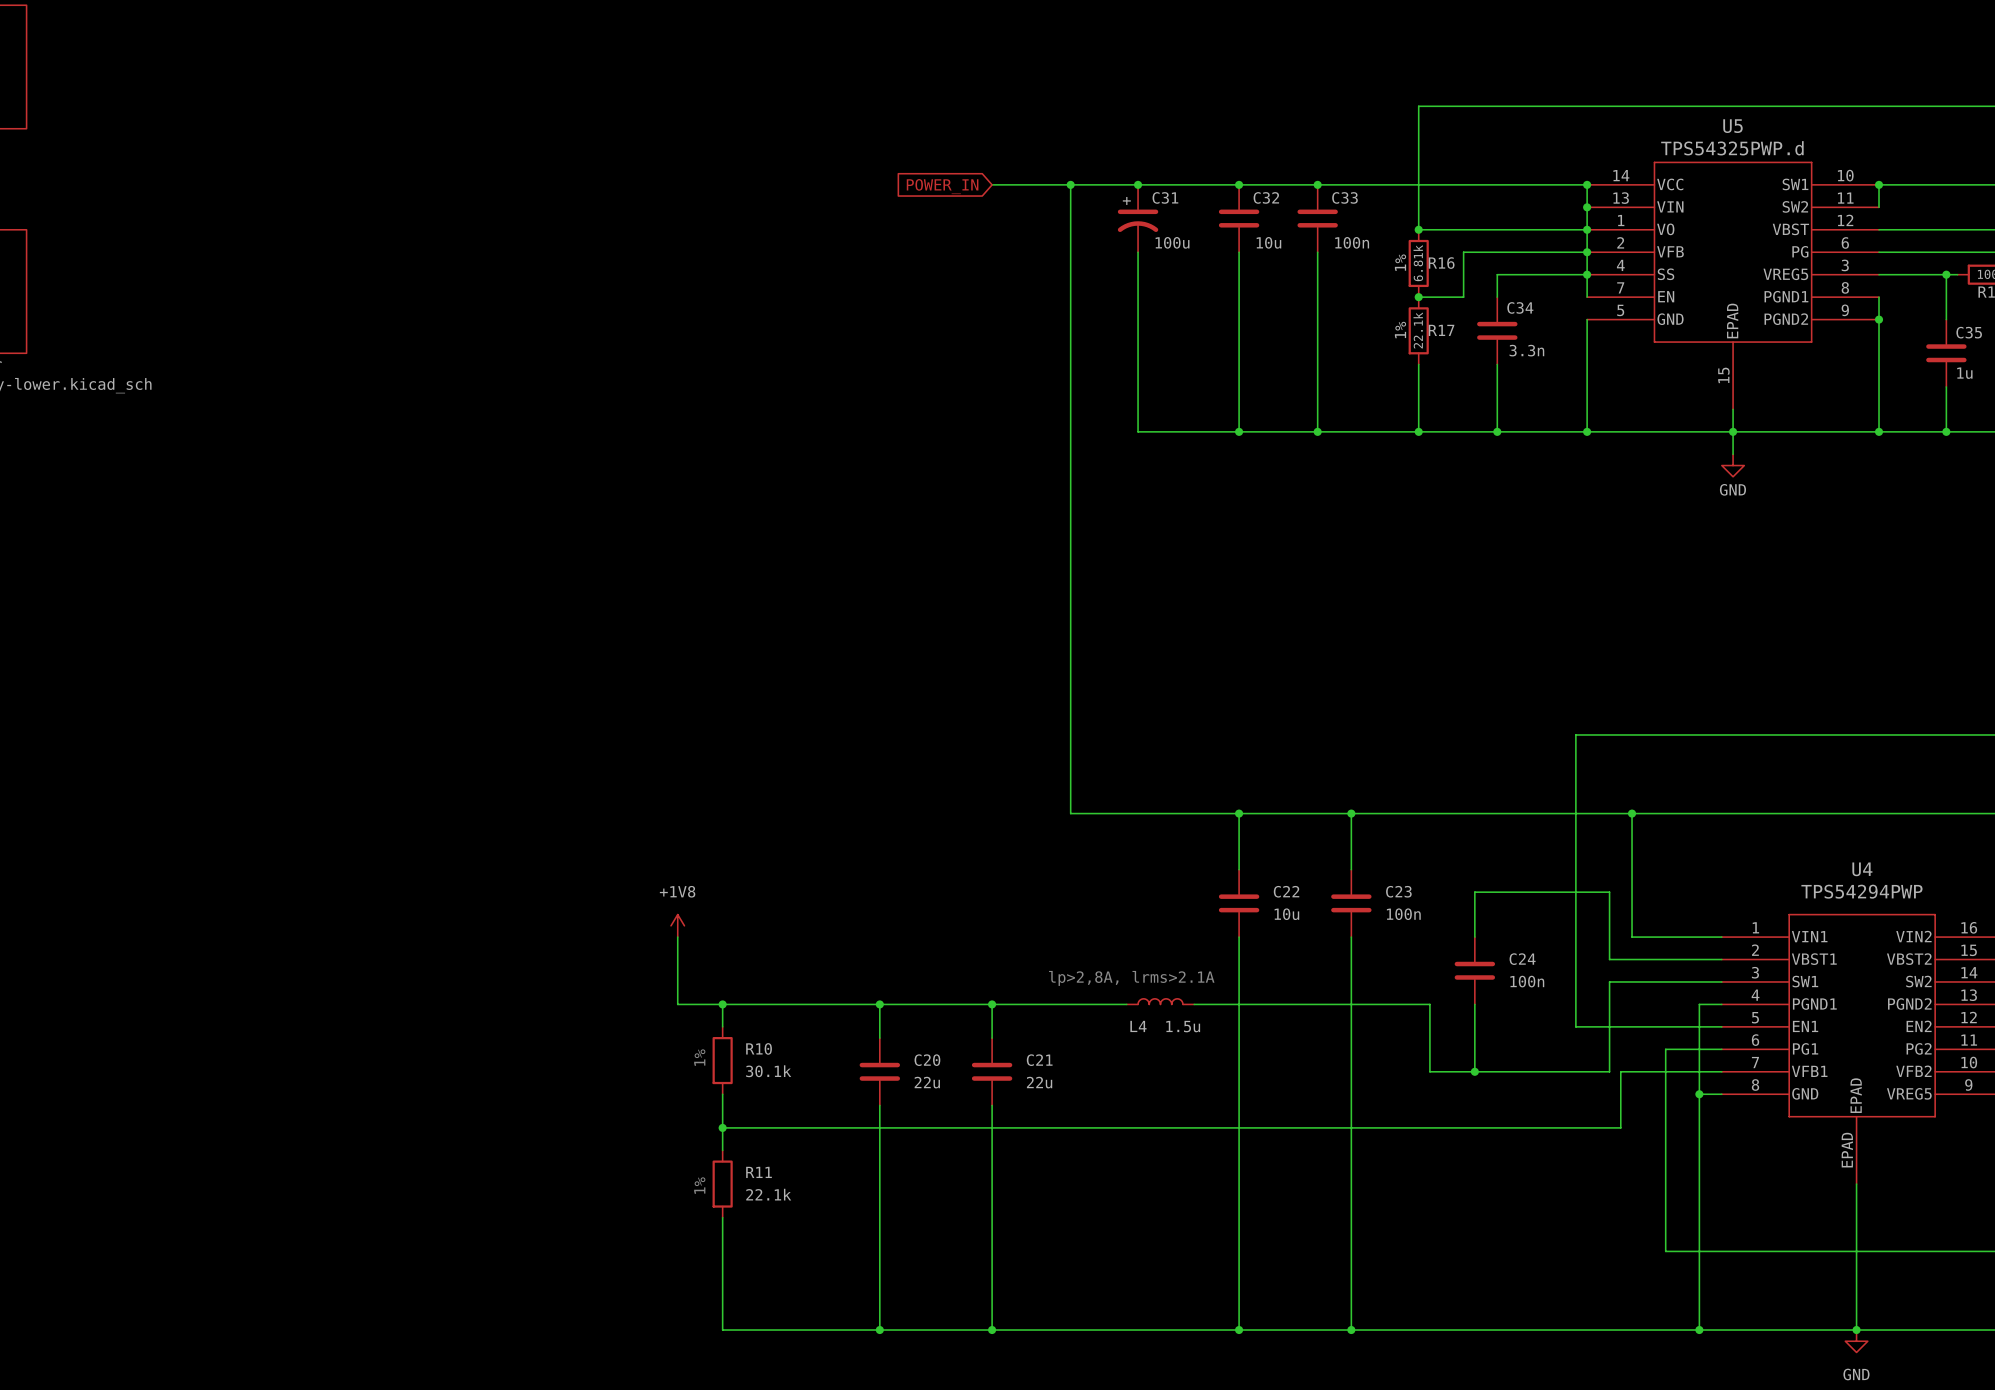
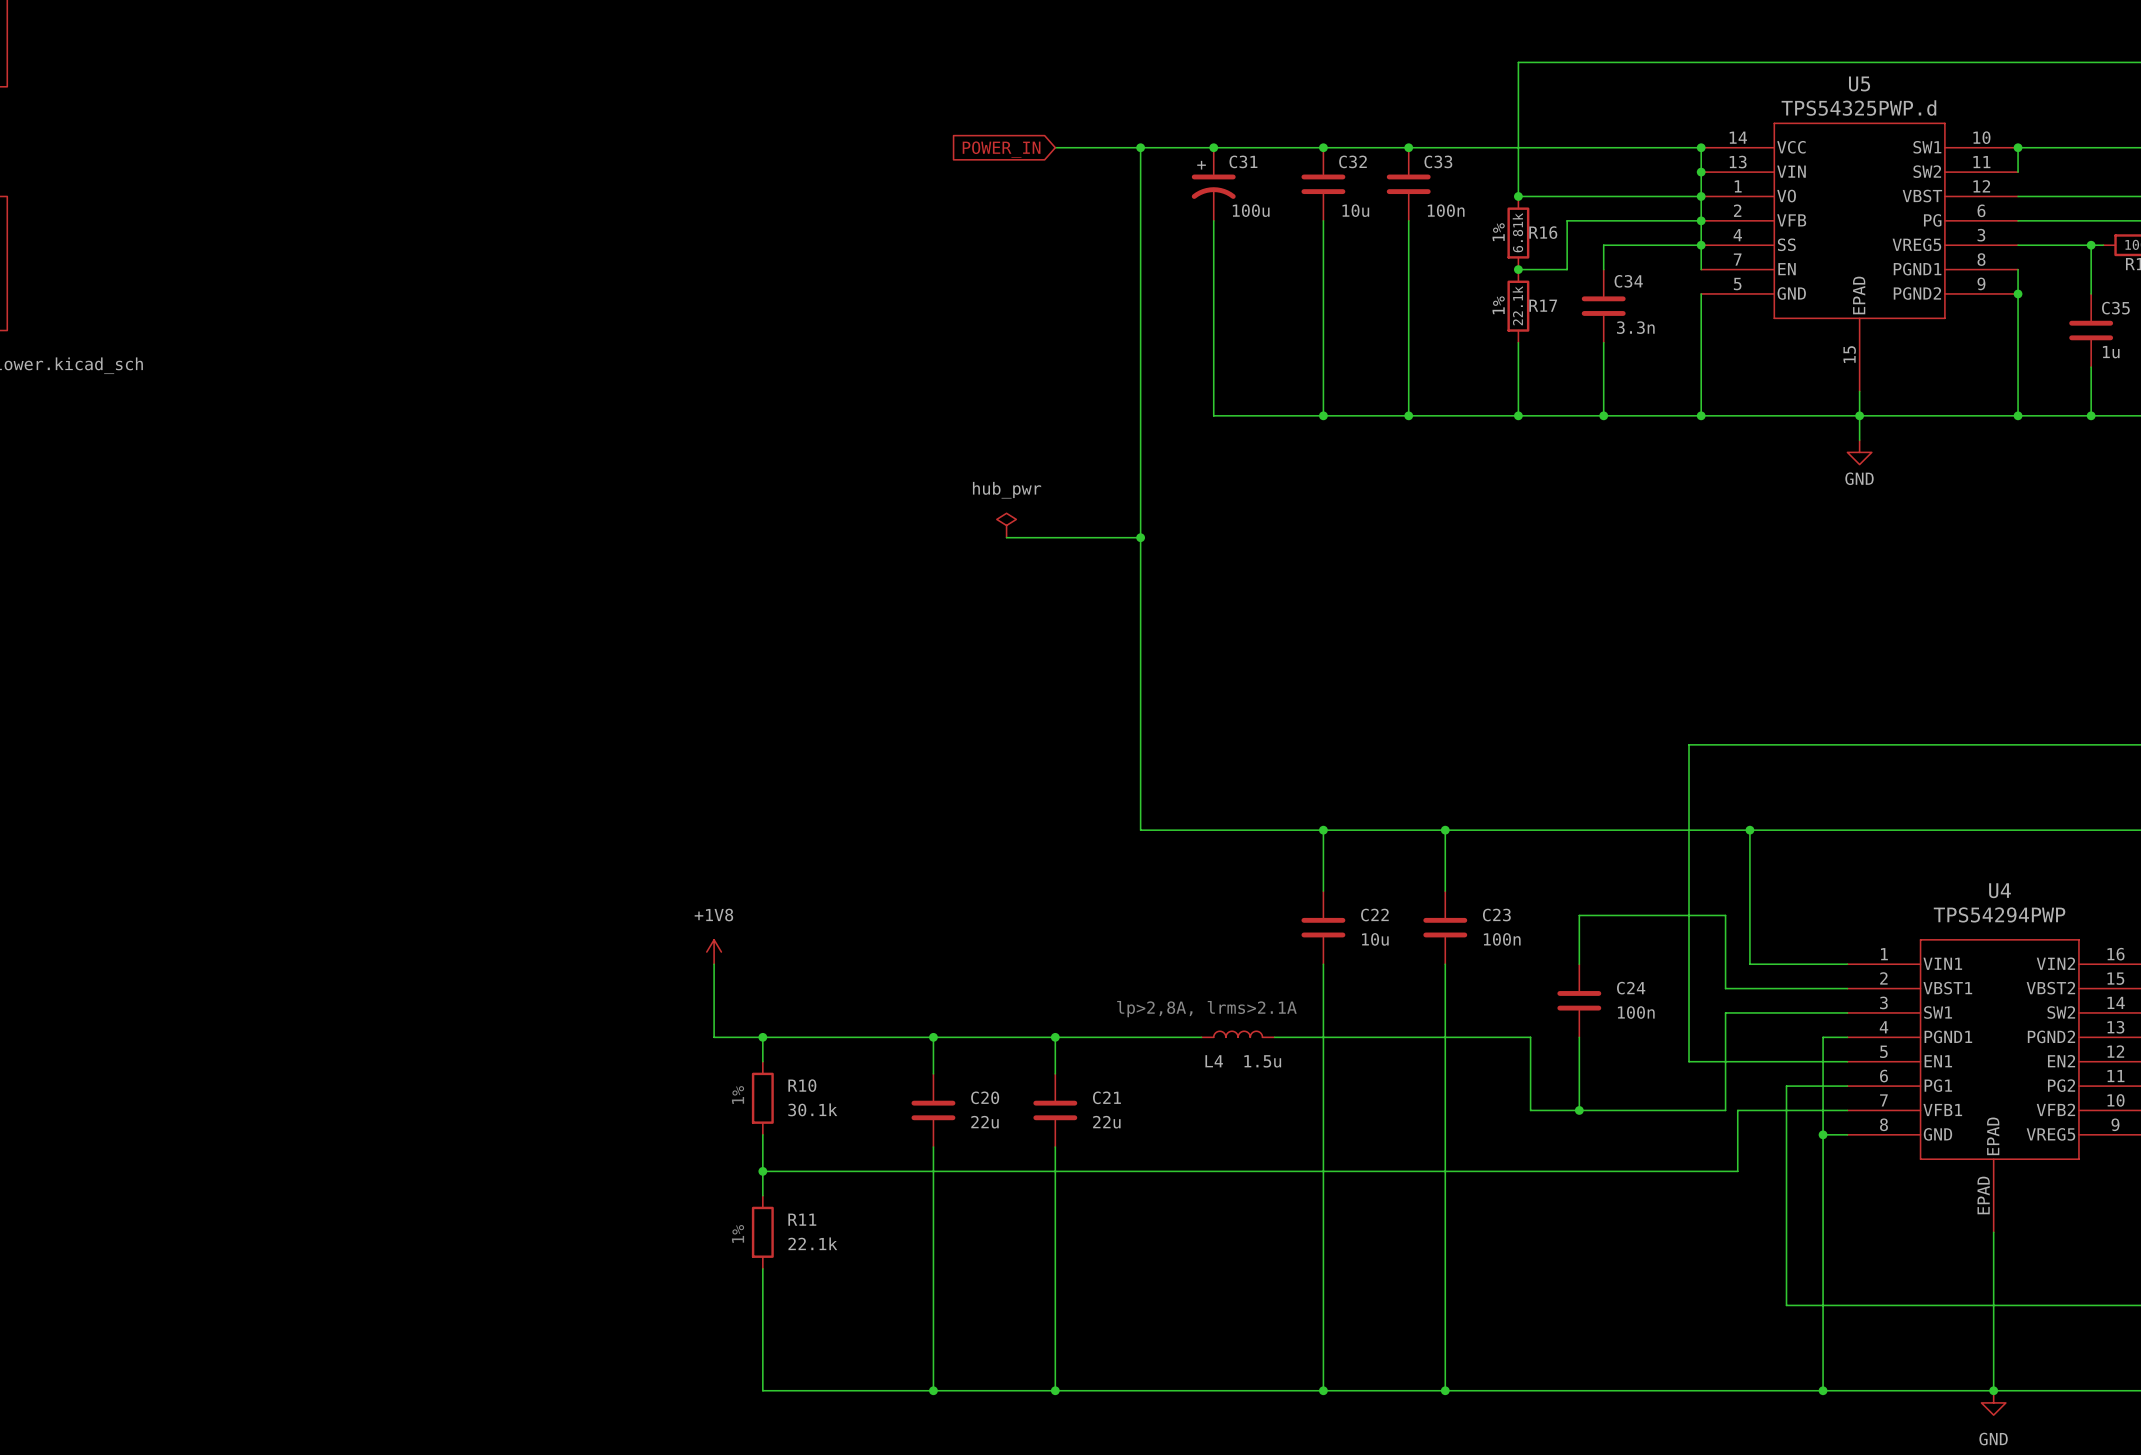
power symbol: none -> hub_pwr (1006, 525)
wire: none -> (1006, 537) (1140, 537)
junction: none -> (1140, 537)

